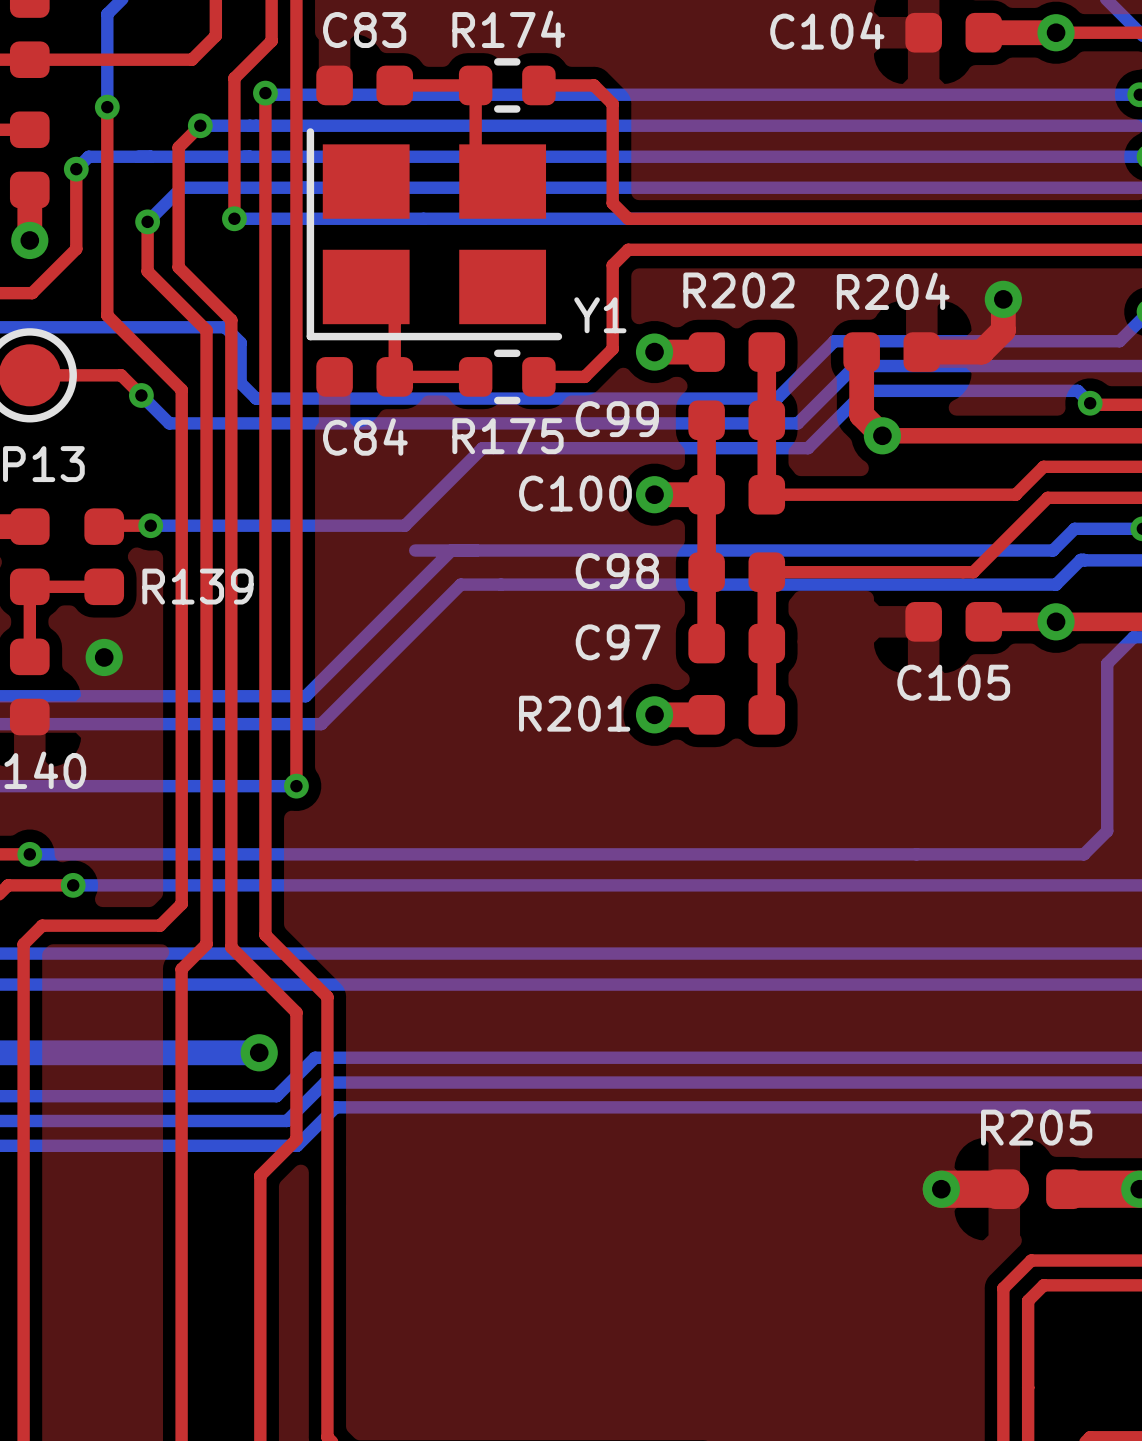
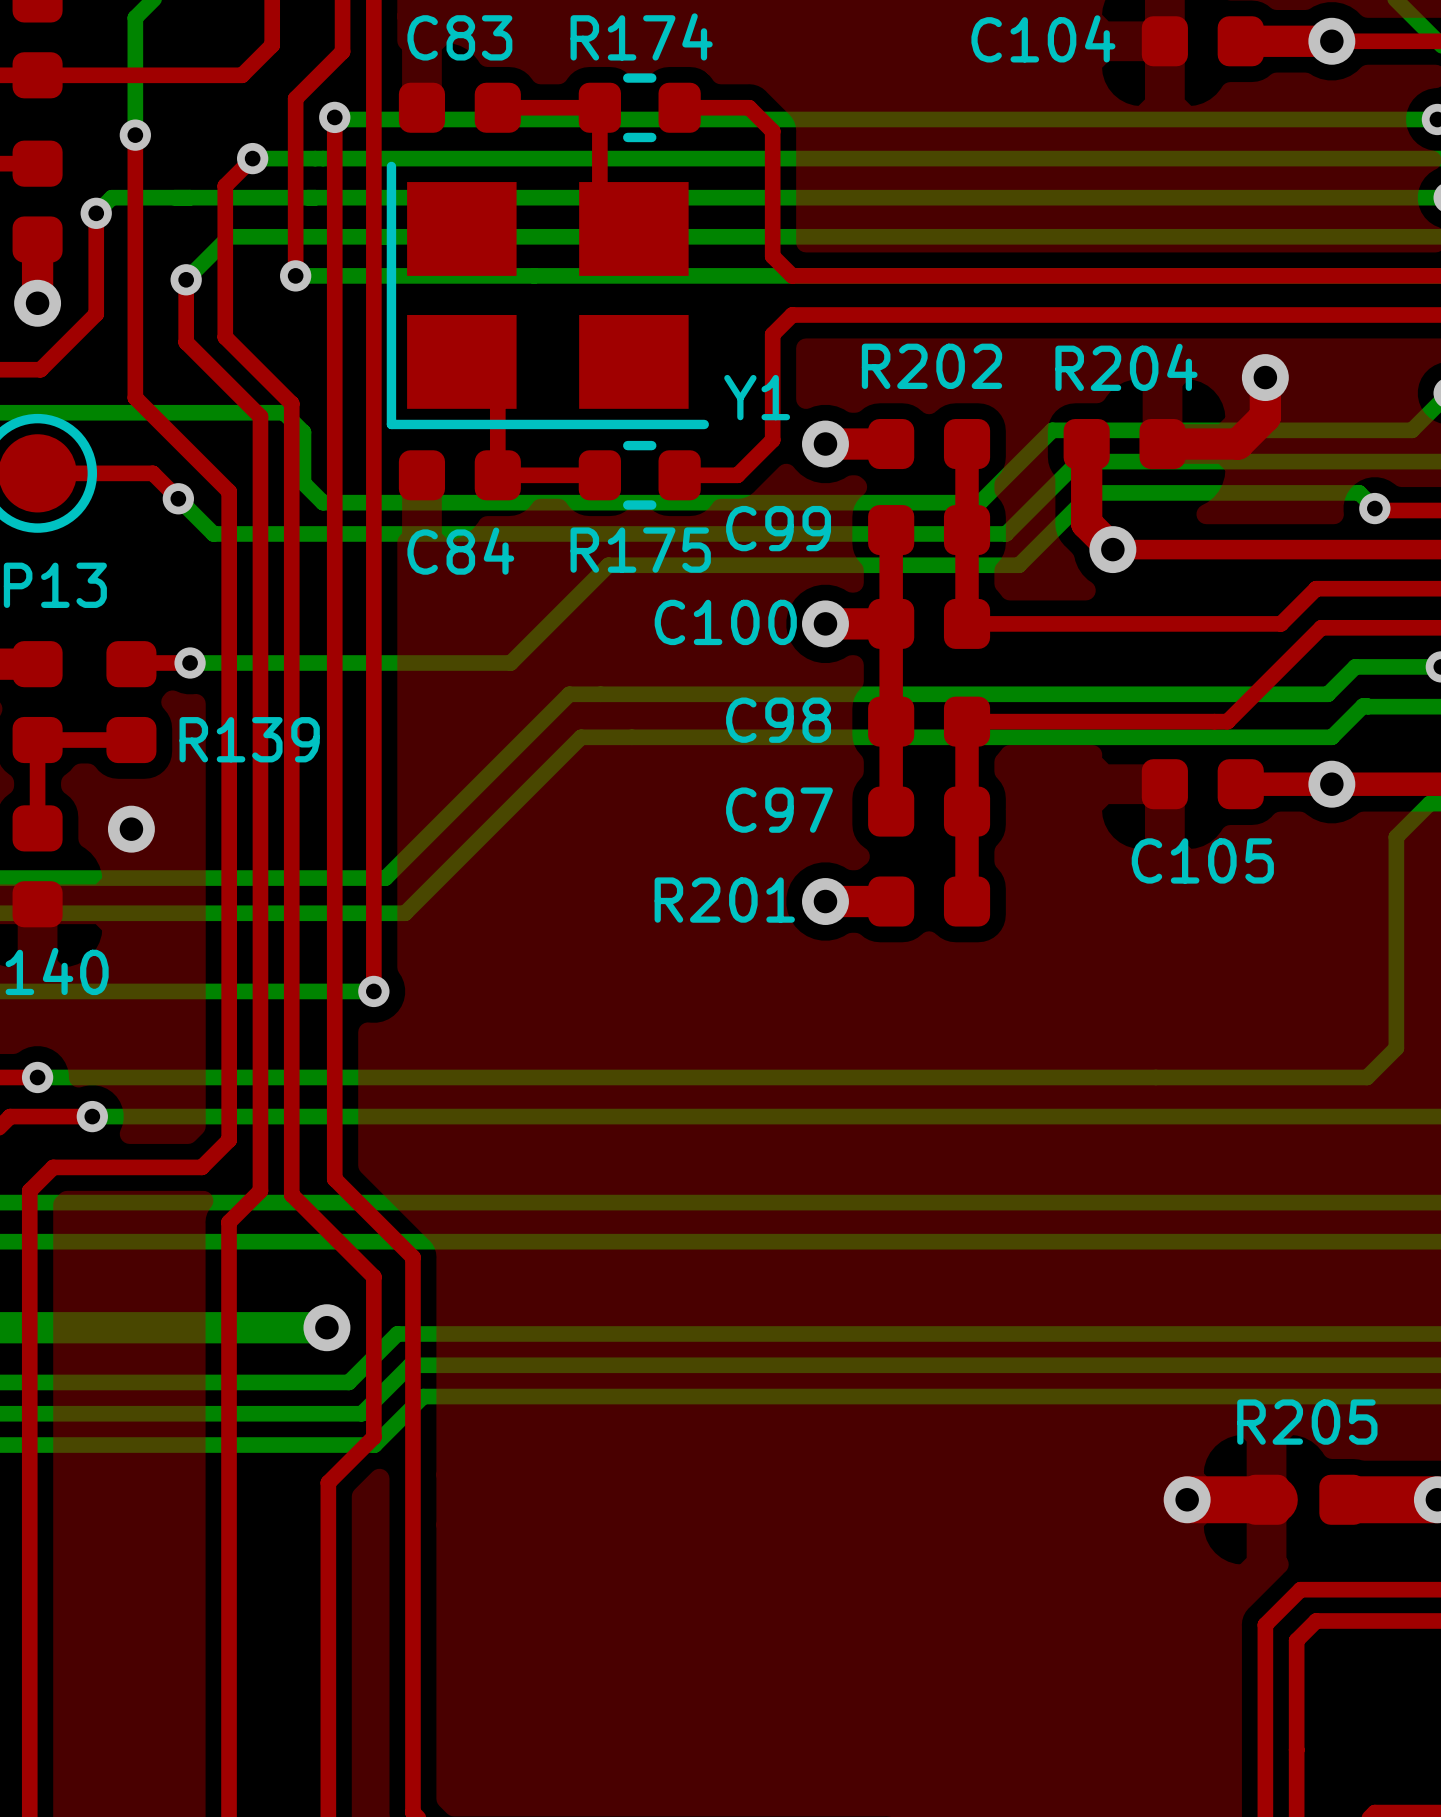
bottom track: (415, 550) (451, 550) -> none

